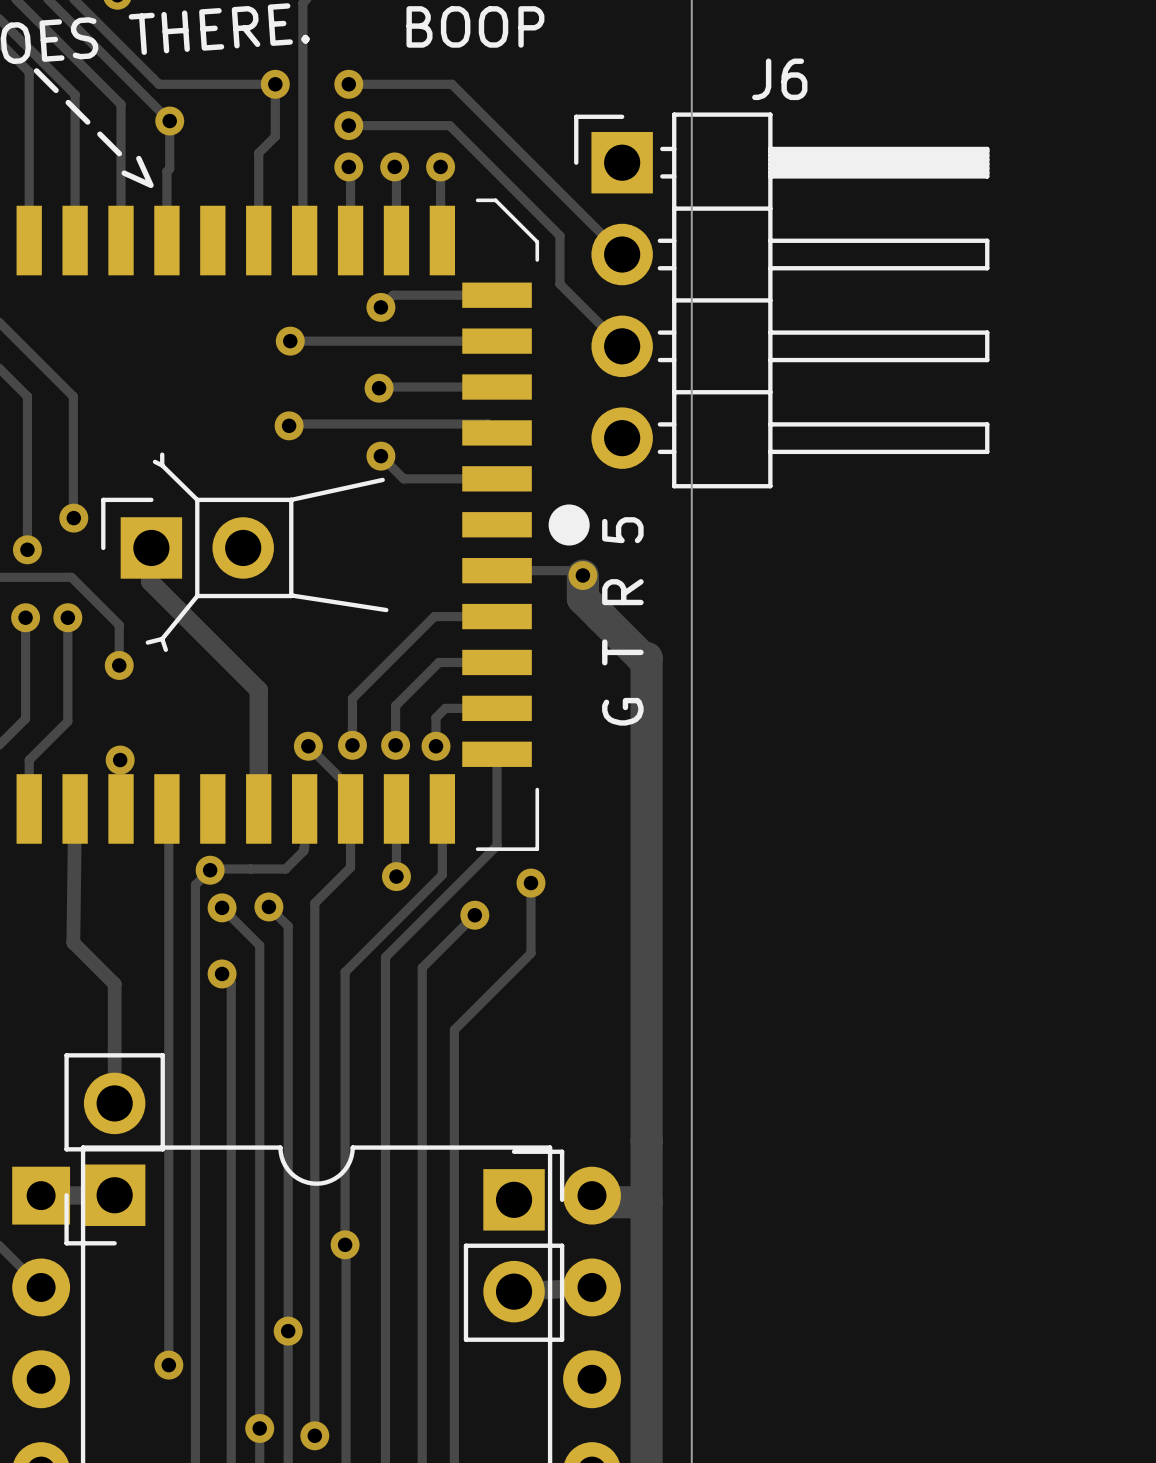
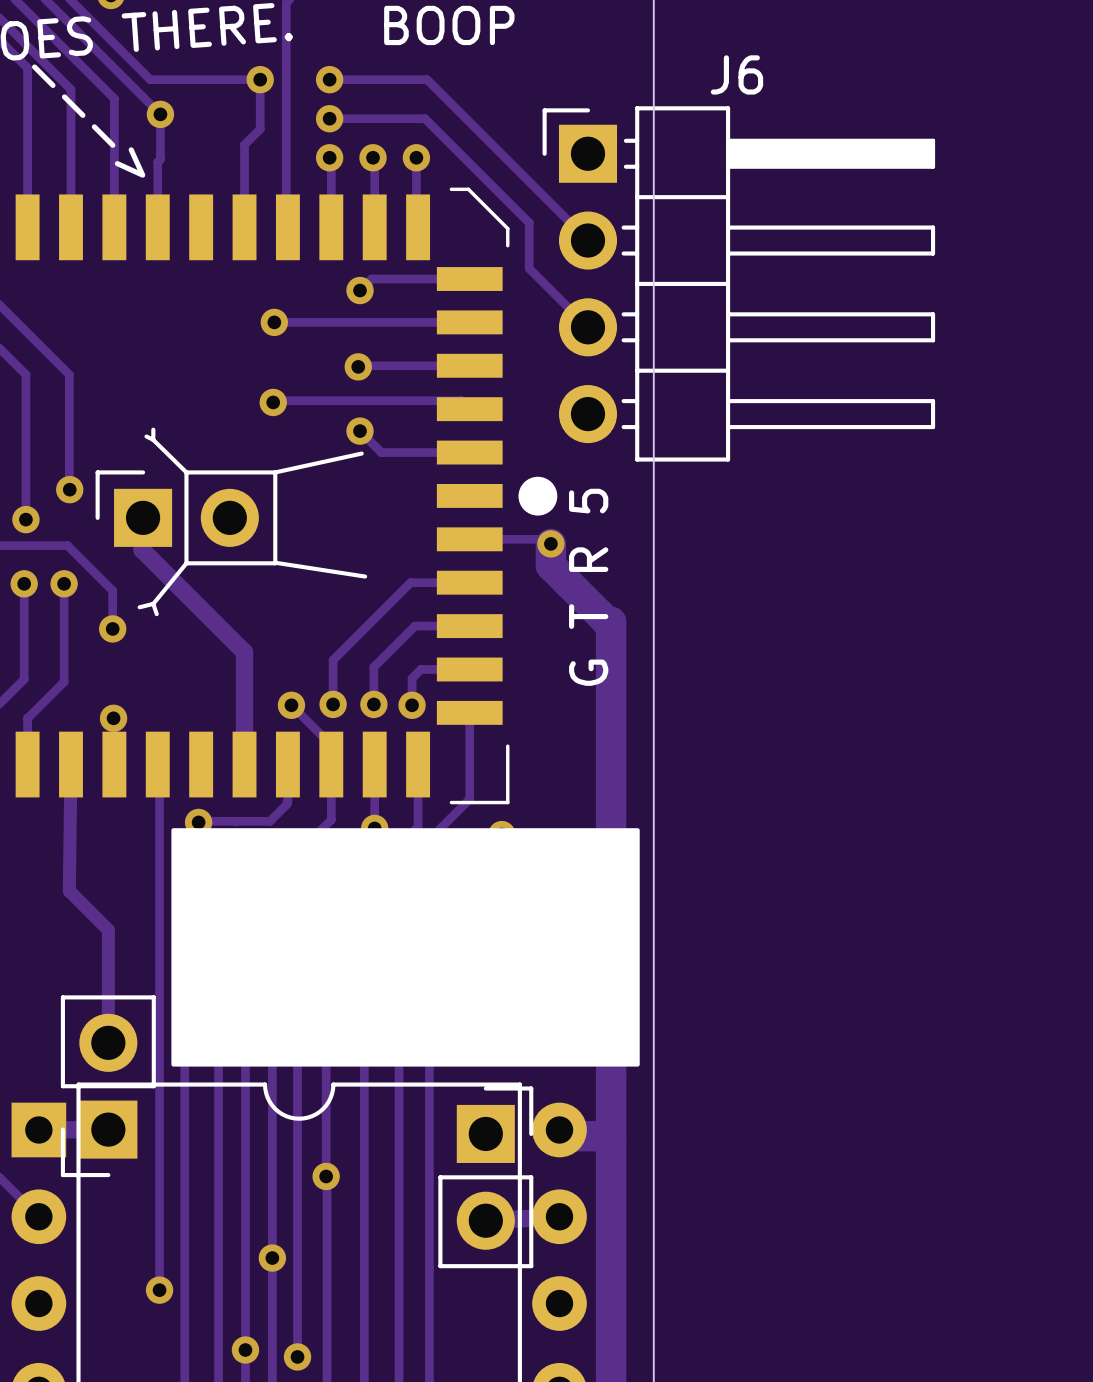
drawing: none -> [171, 828, 640, 1067]

